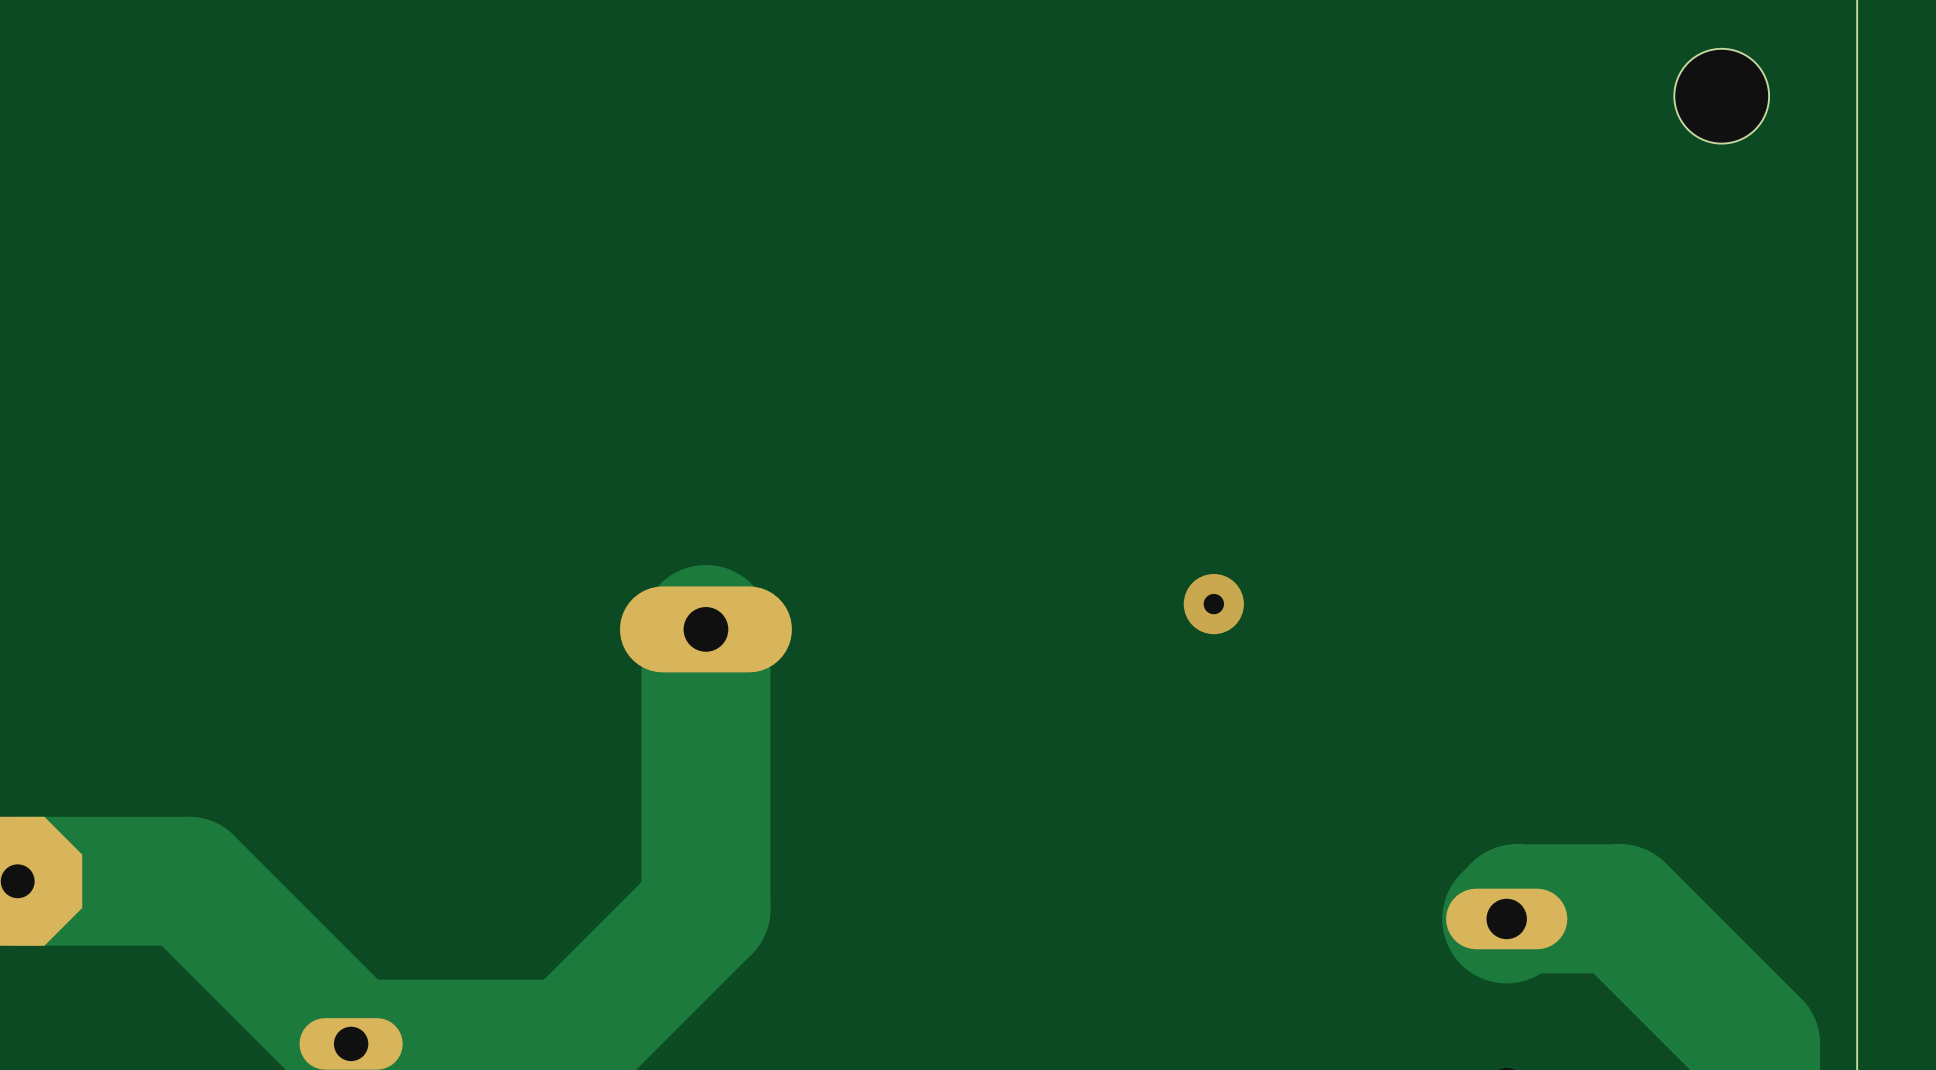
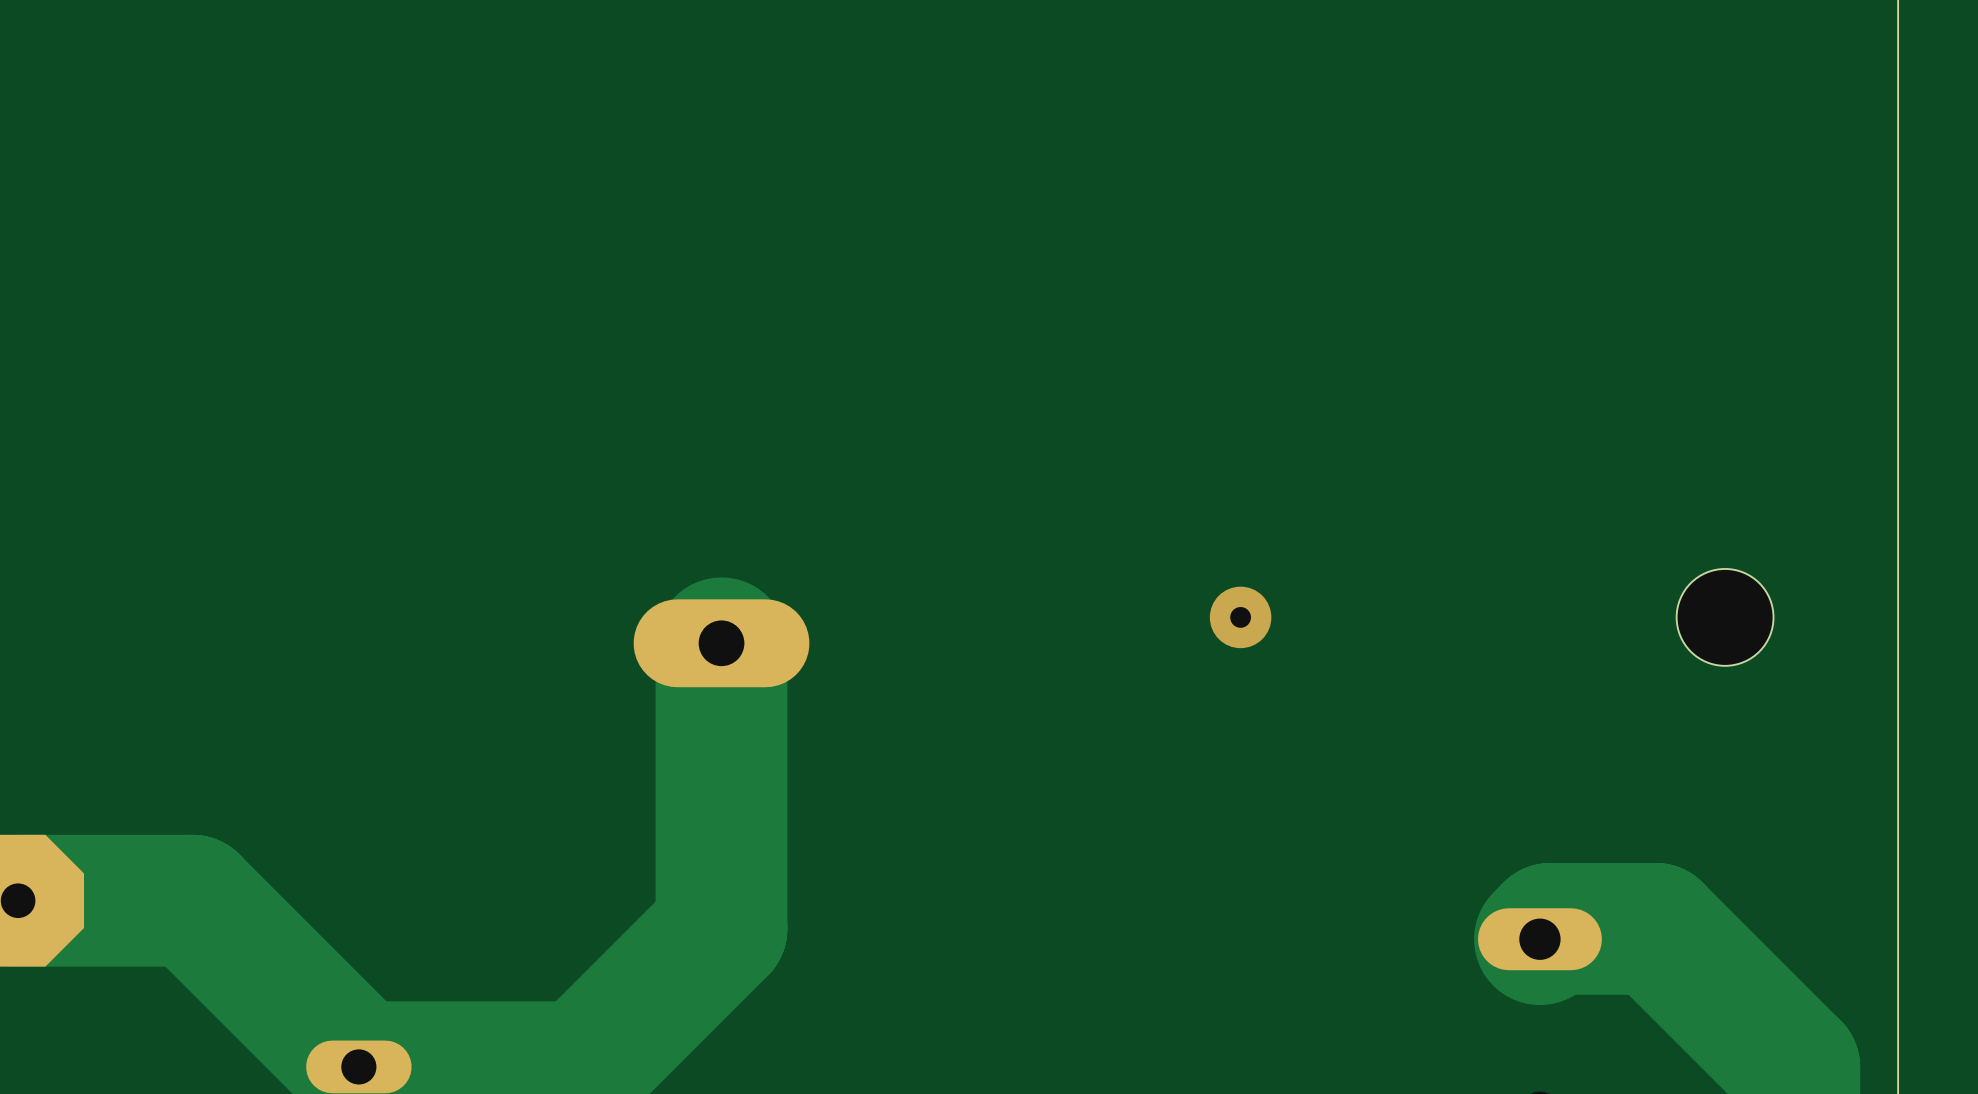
part position: (1721, 96) -> (1725, 617)

